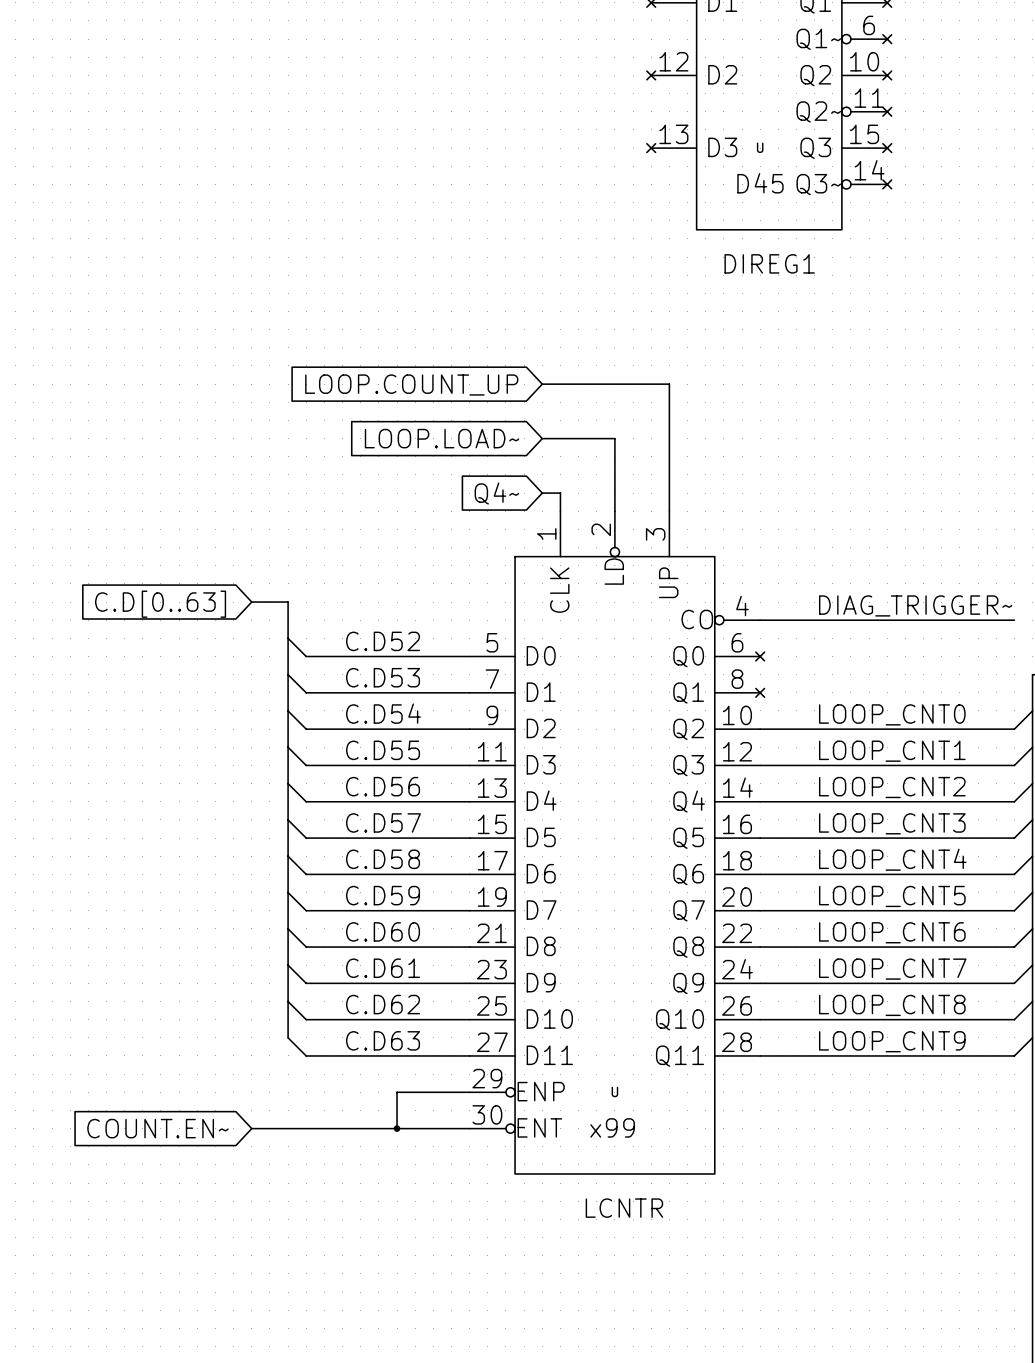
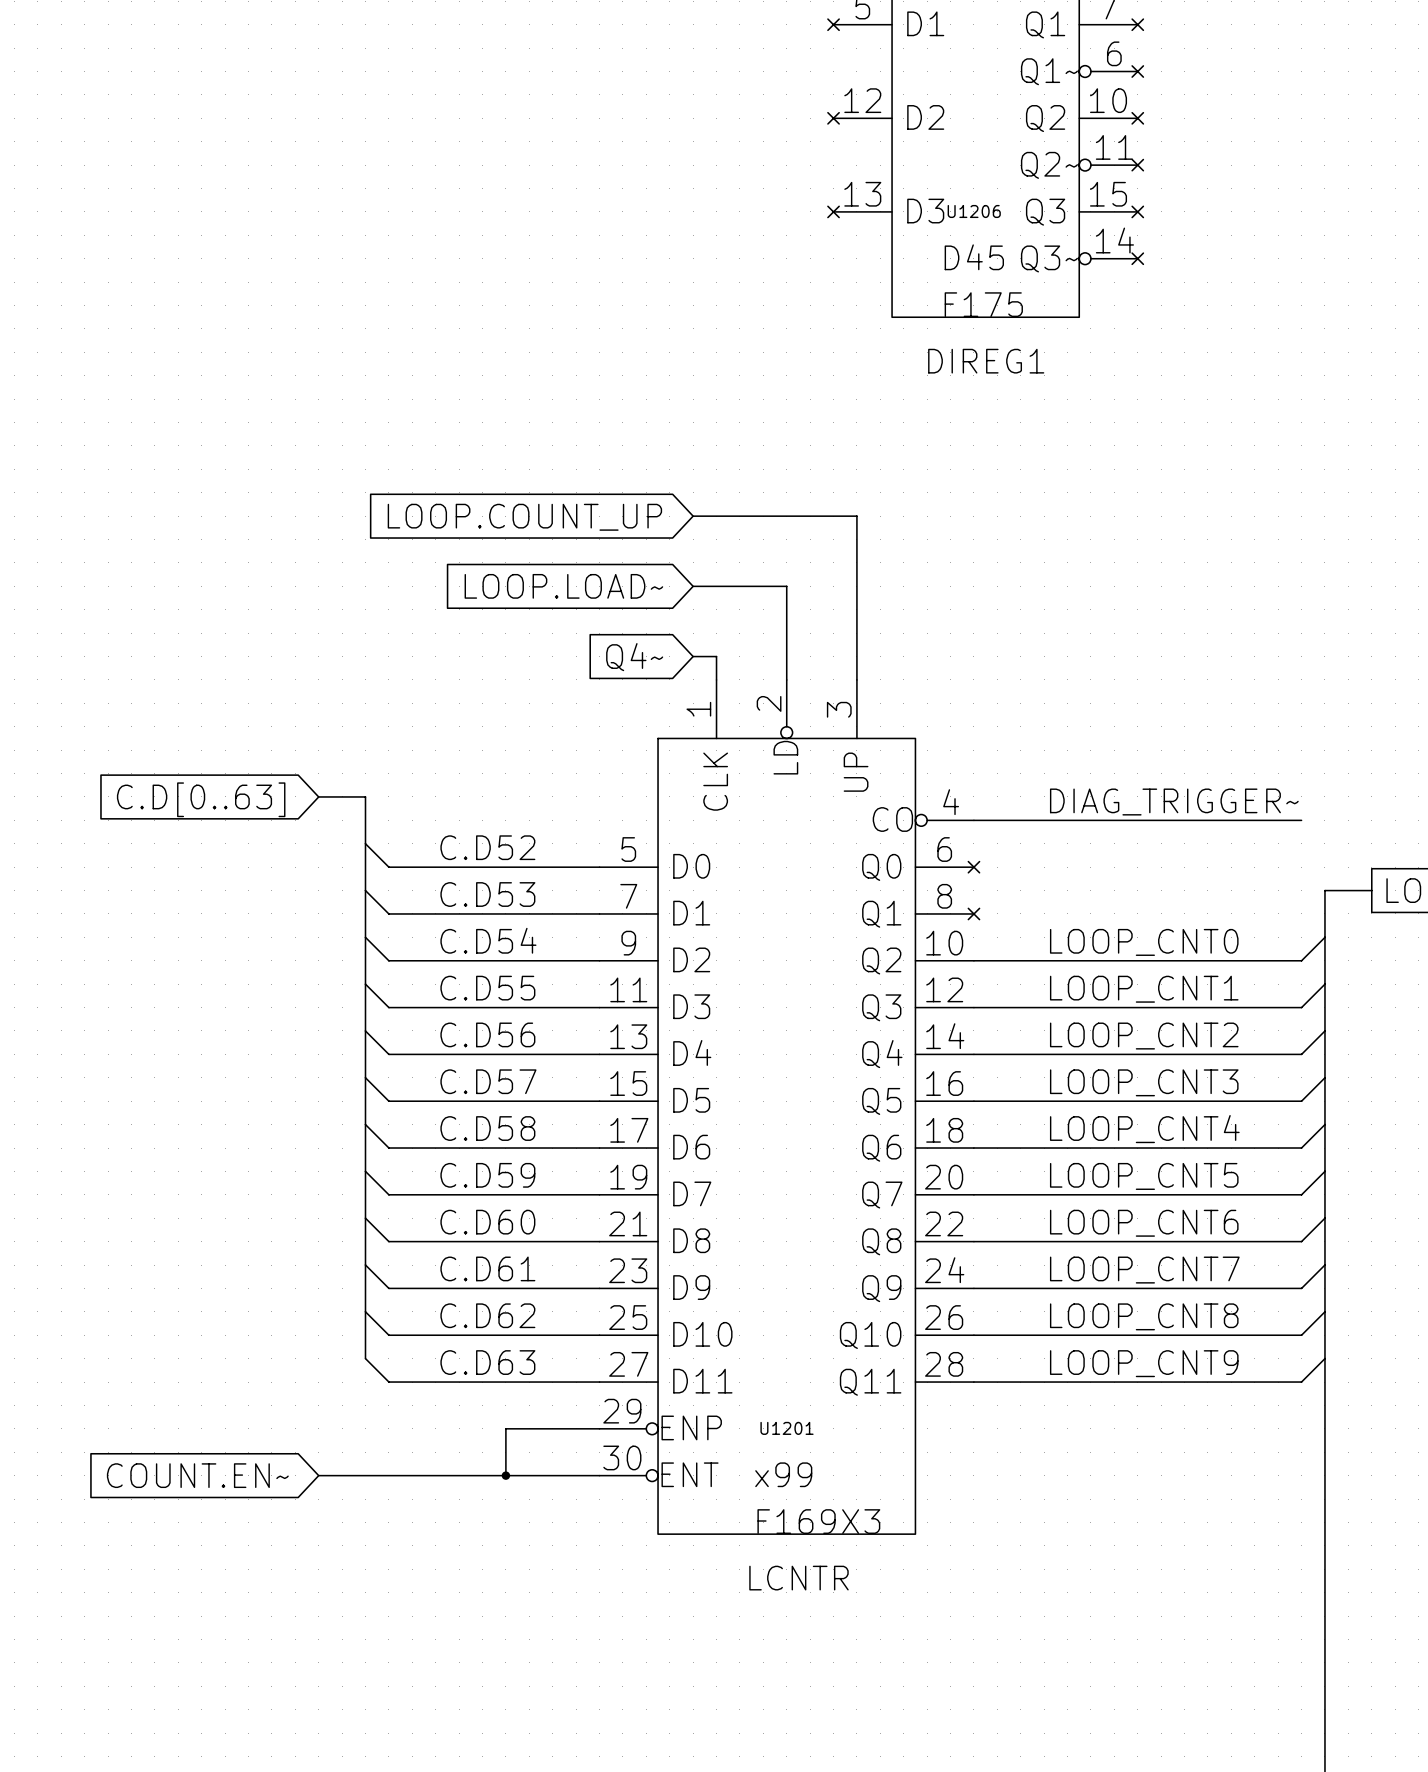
U name: U (760, 147) -> U1206 (974, 211)
U value: none -> F175 (983, 304)
U name: U (614, 1091) -> U1201 (787, 1428)
U value: none -> F169X3 (818, 1521)

